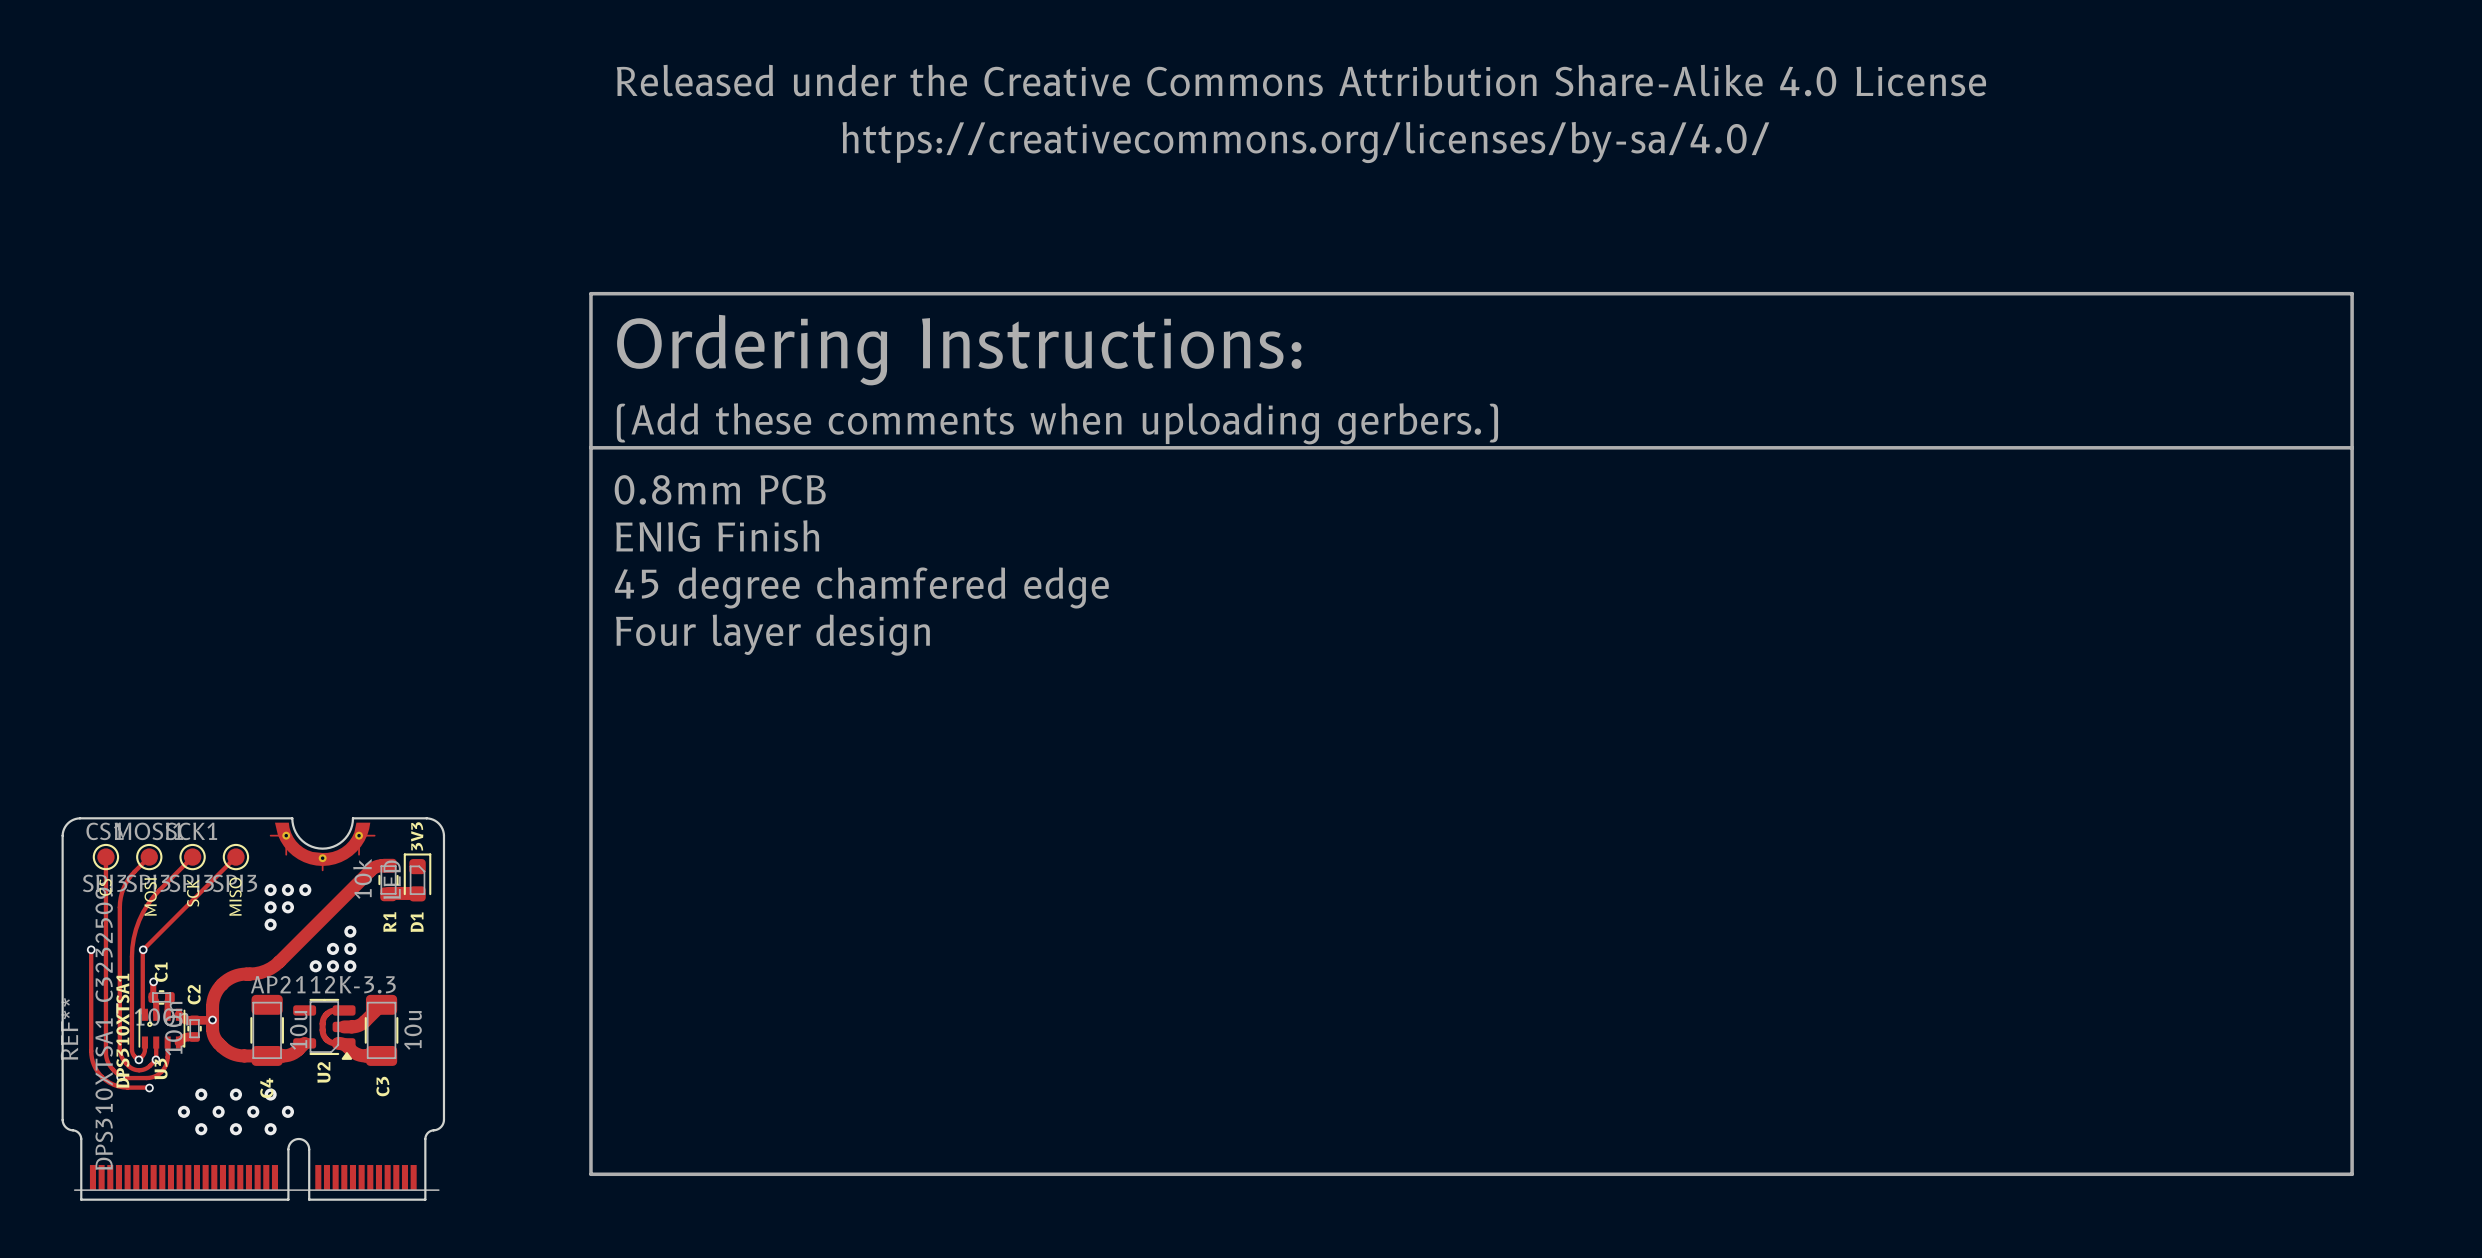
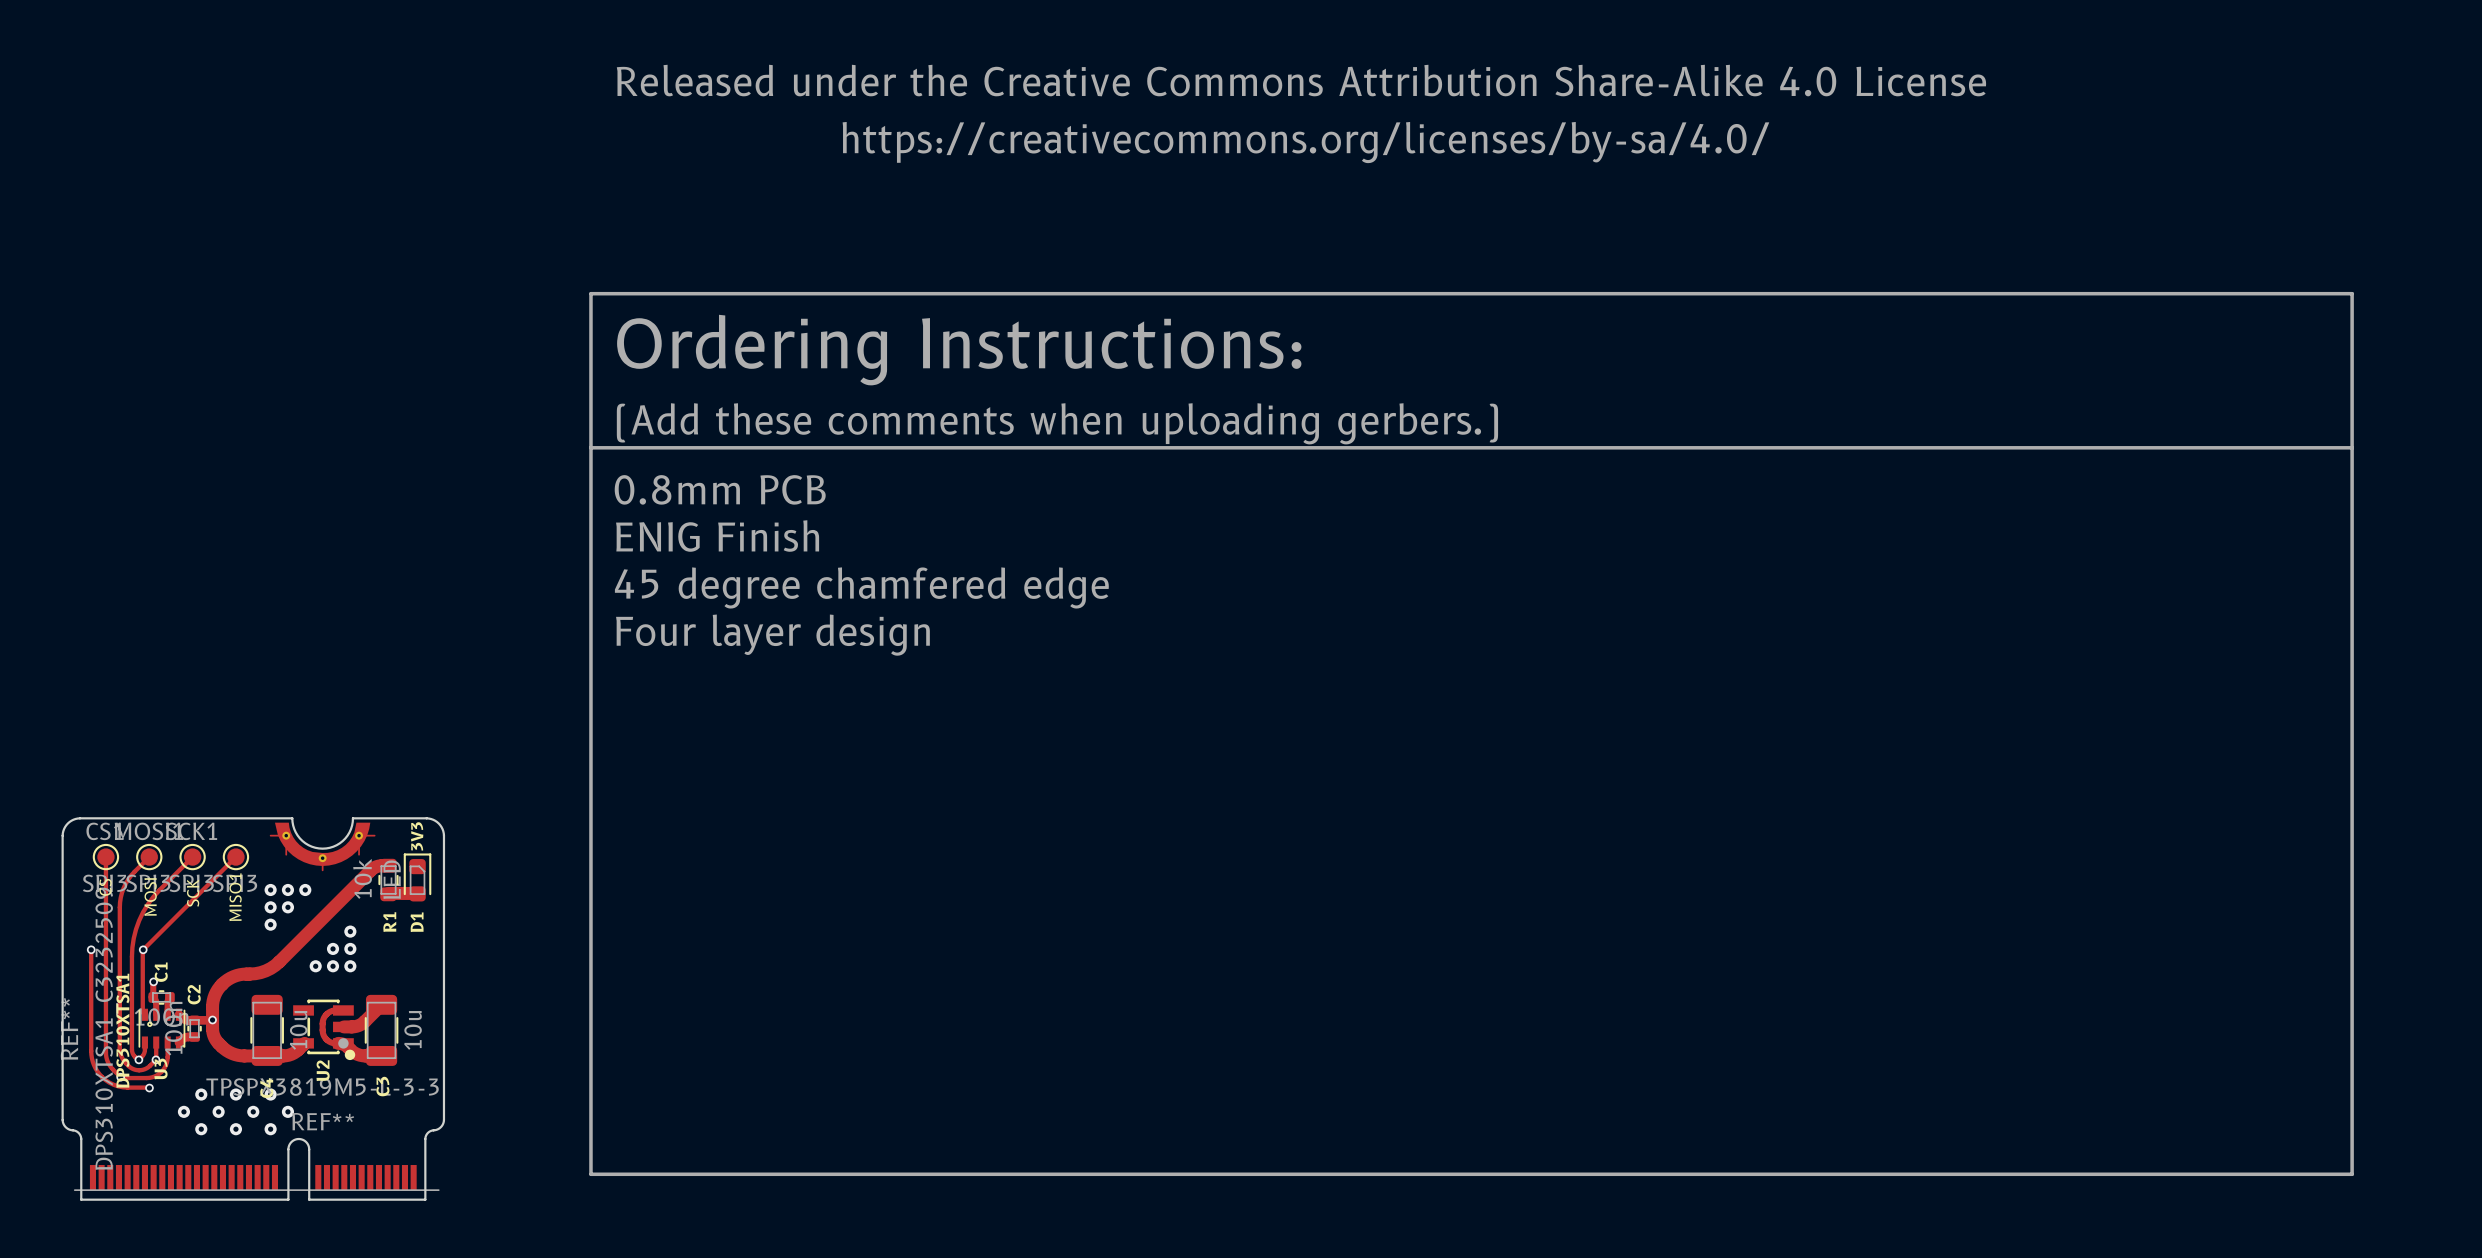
MISO name: MISO (235, 896) -> MISO1 (235, 897)
U2 value: AP2112K-3.3 (323, 984) -> TPSPX3819M5-L-3-3 (322, 1087)
U2 footprint: [293, 998, 356, 1060] -> [293, 999, 356, 1061]

